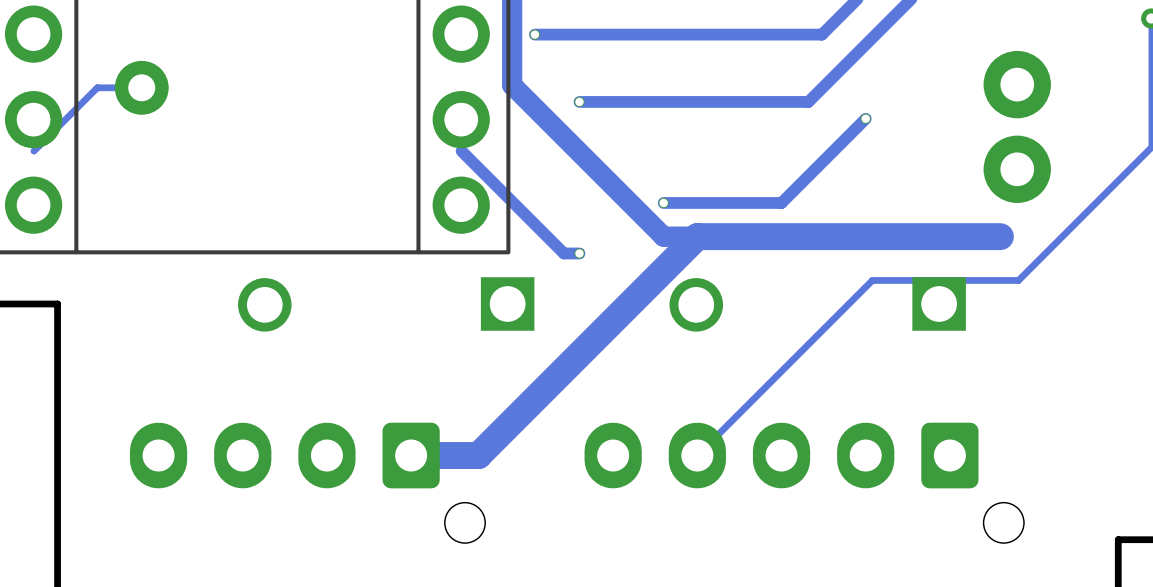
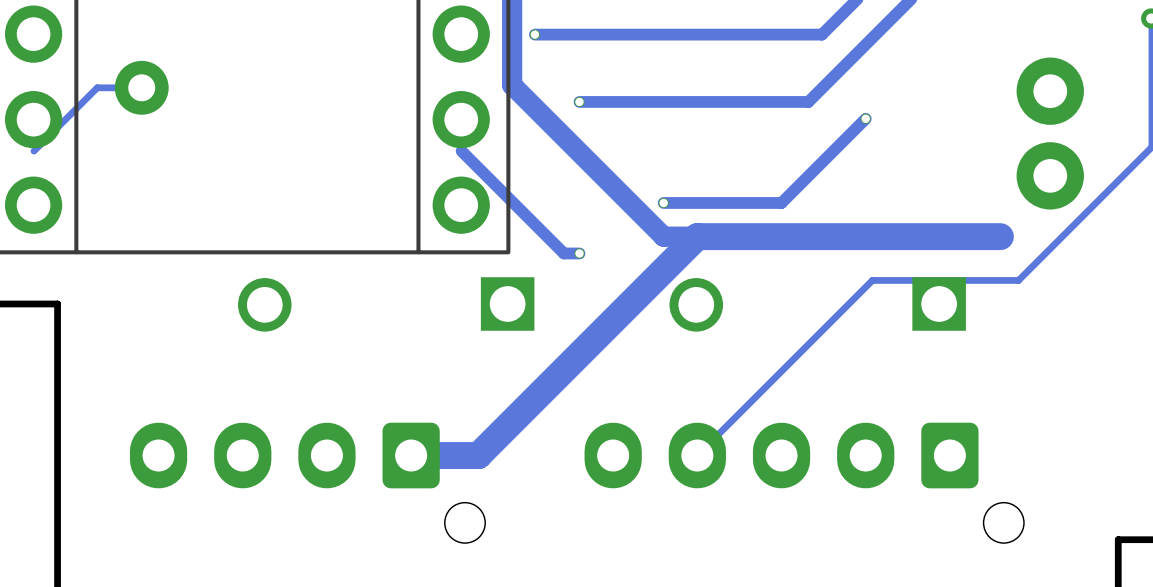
part position: (1017, 126) -> (1050, 133)

